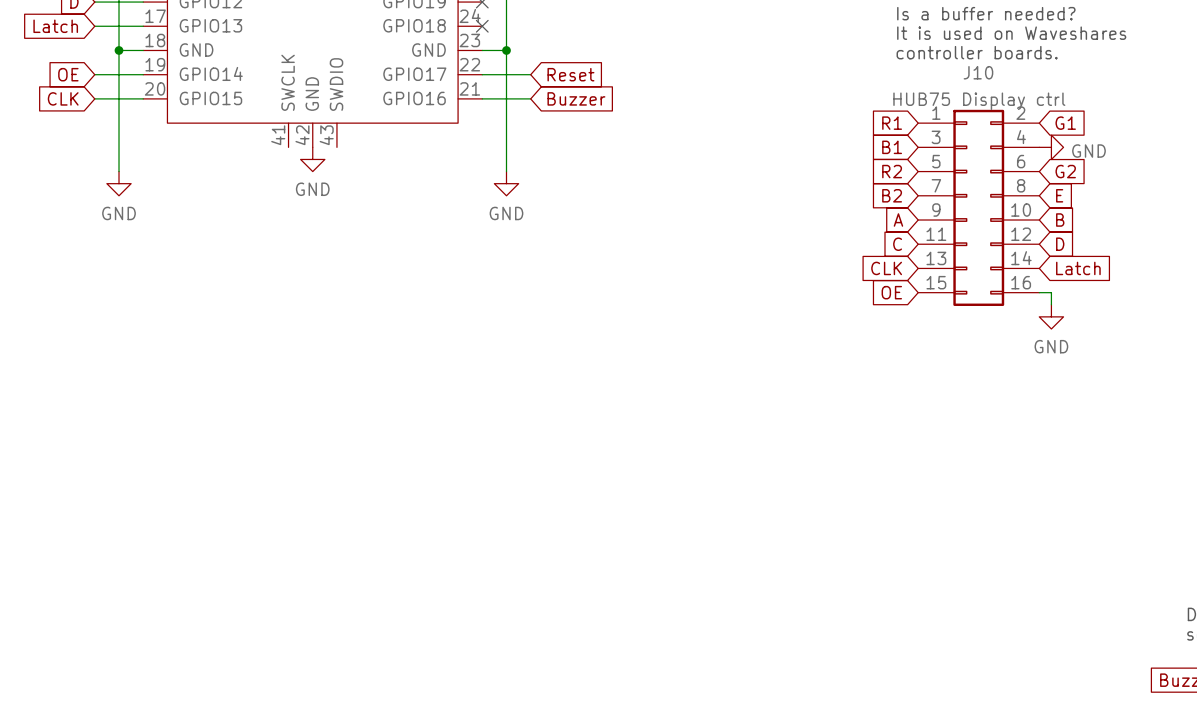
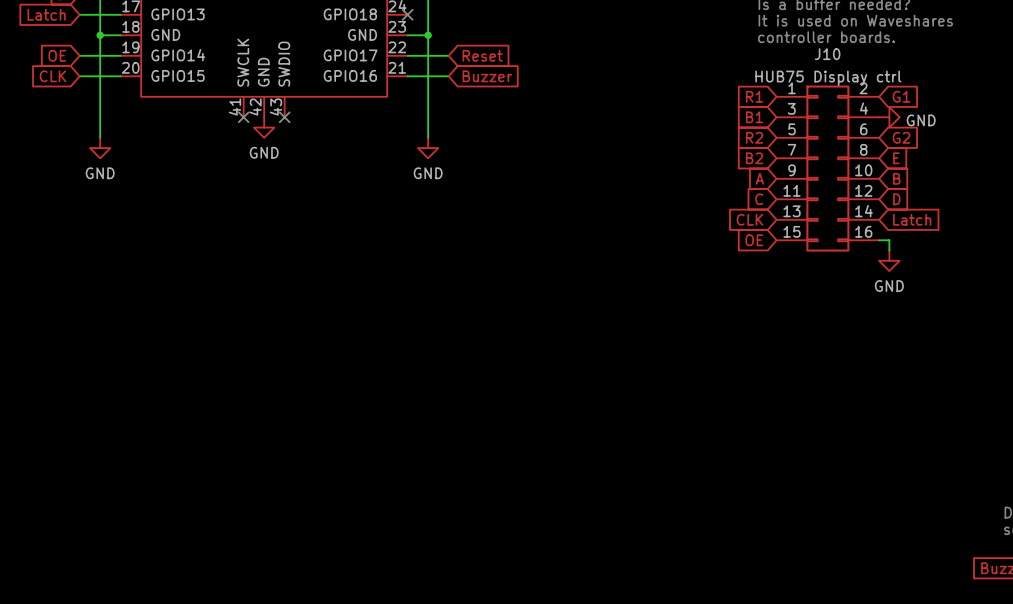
no-connect mark: none -> (243, 117)
no-connect mark: none -> (284, 117)

